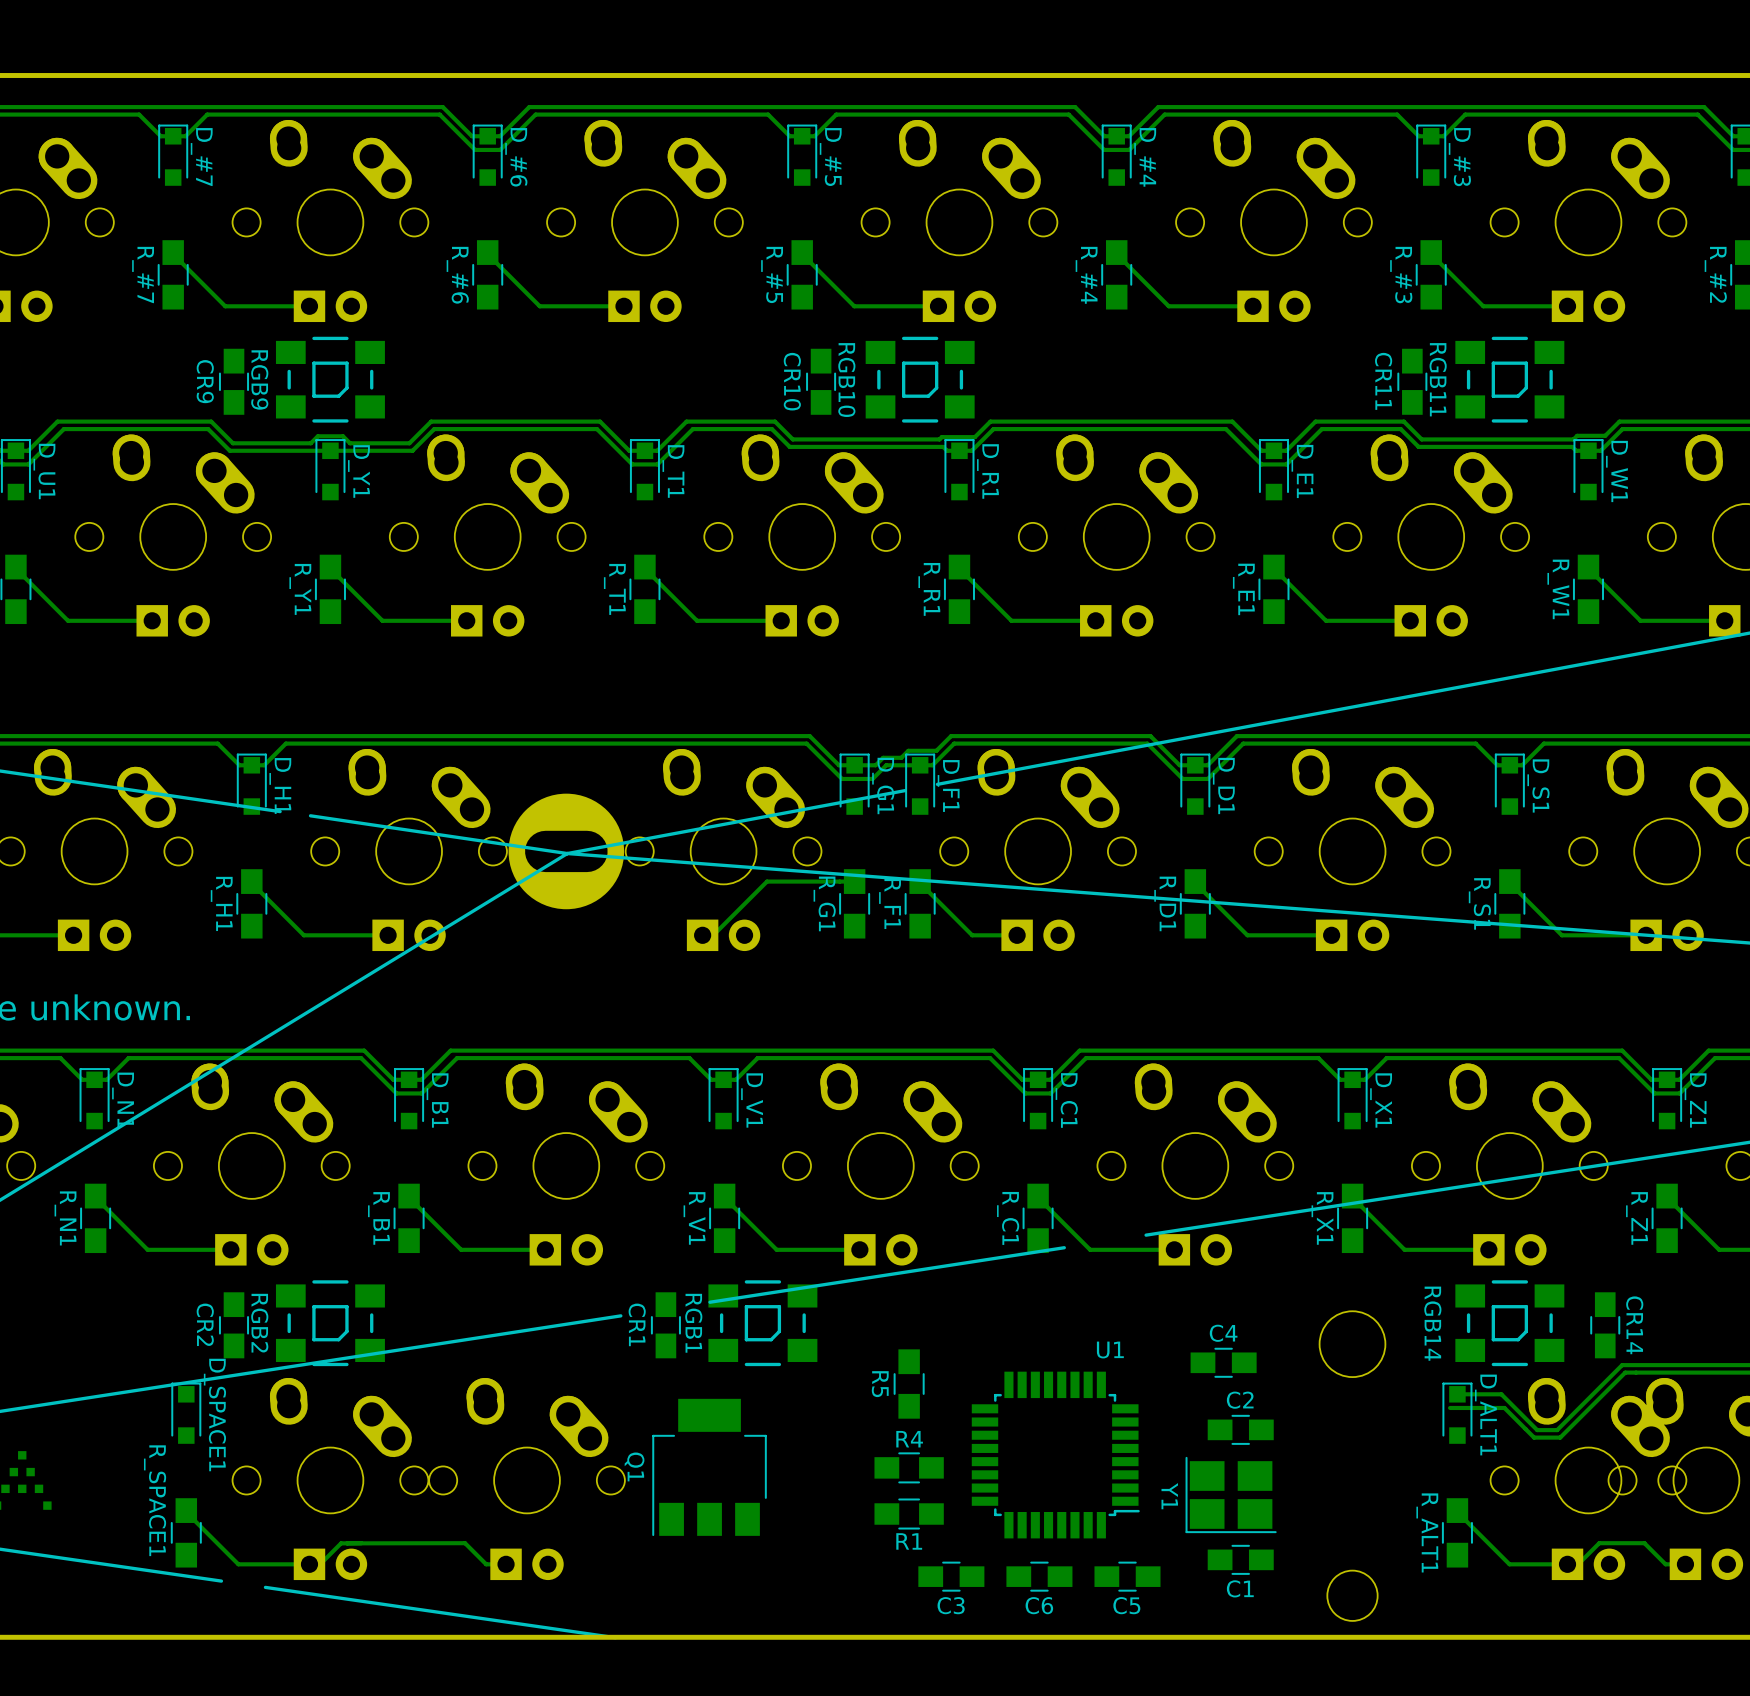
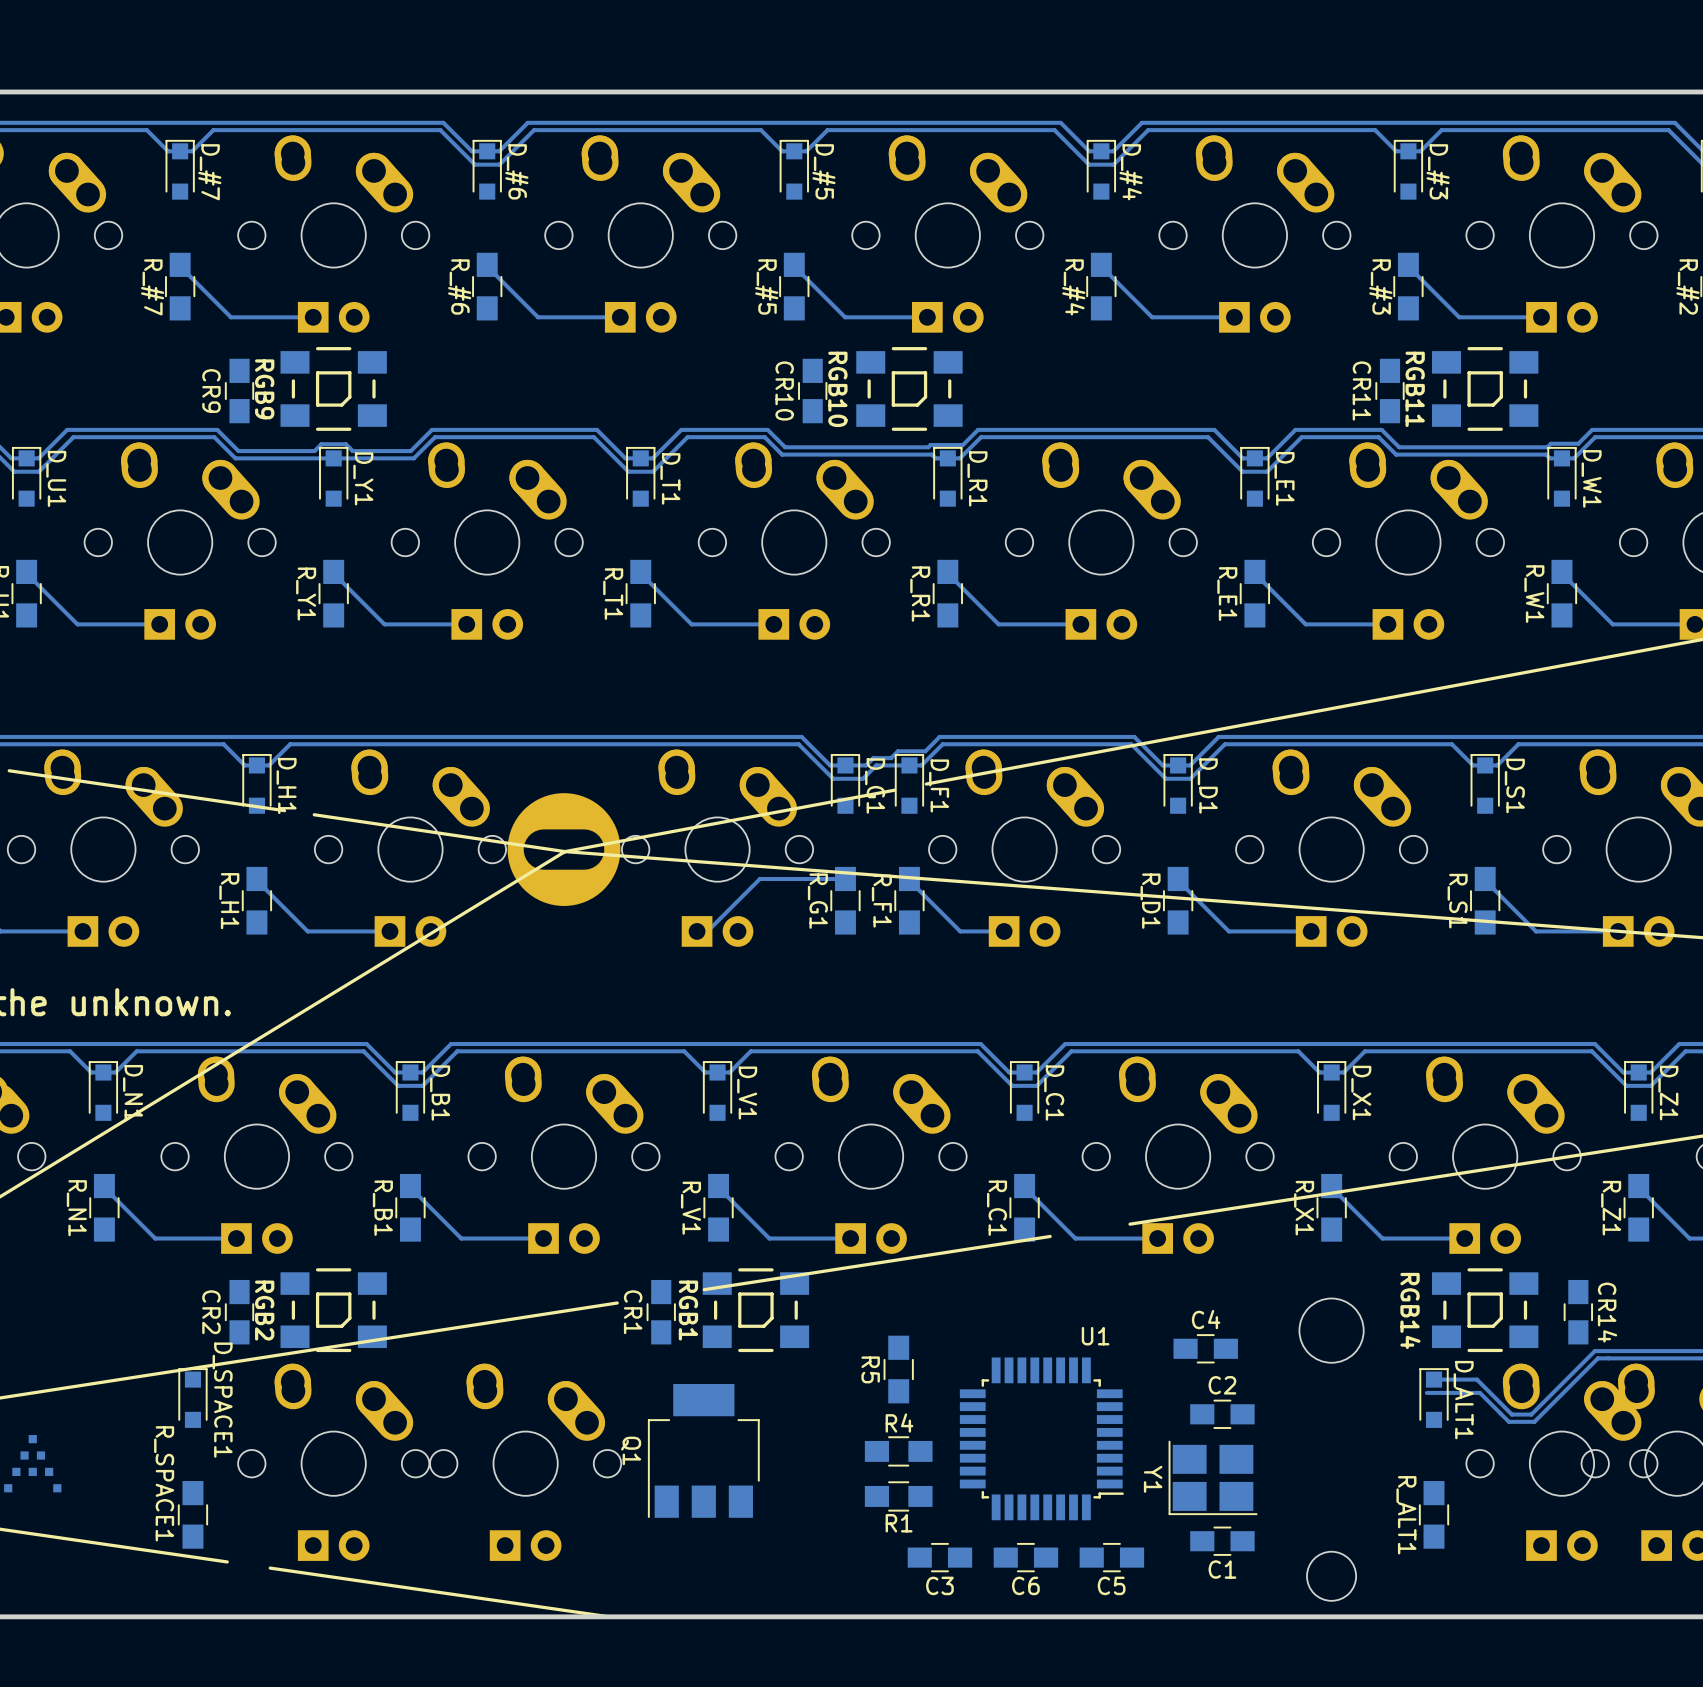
bottom track: (186, 1510) (238, 1564) (320, 1564) (341, 1543) (347, 1543) -> none
bottom track: (1457, 1510) (1509, 1564) (1578, 1564) (1599, 1543) (1644, 1543) (1665, 1564) (1685, 1564) -> none
bottom track: (347, 1543) (465, 1543) (486, 1564) (506, 1564) -> none

